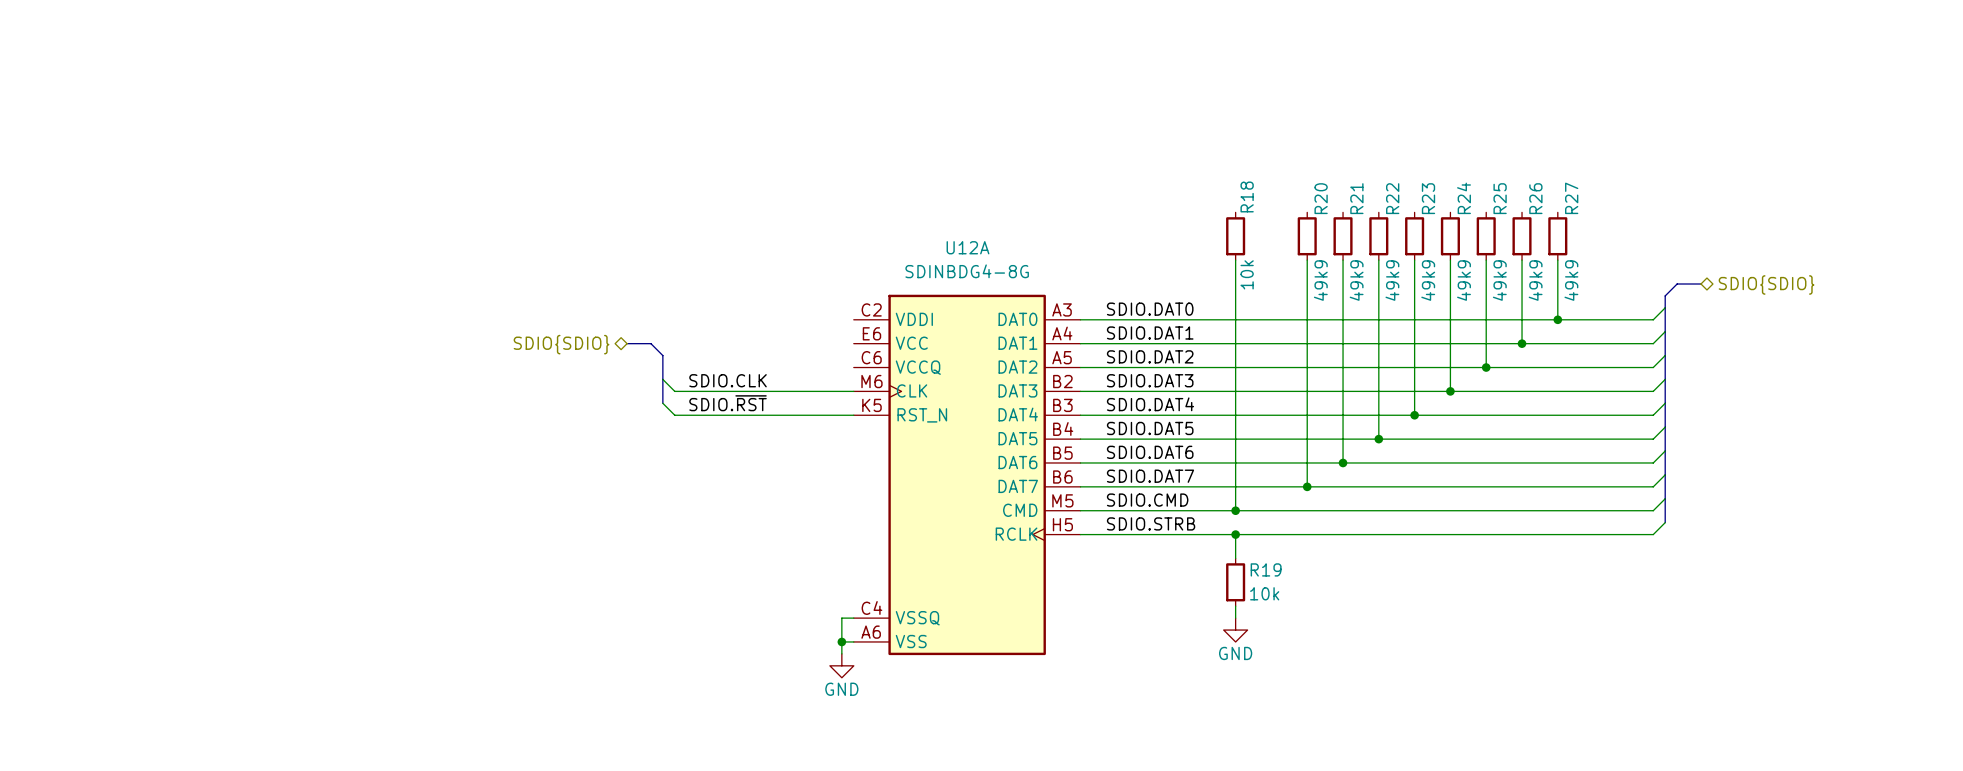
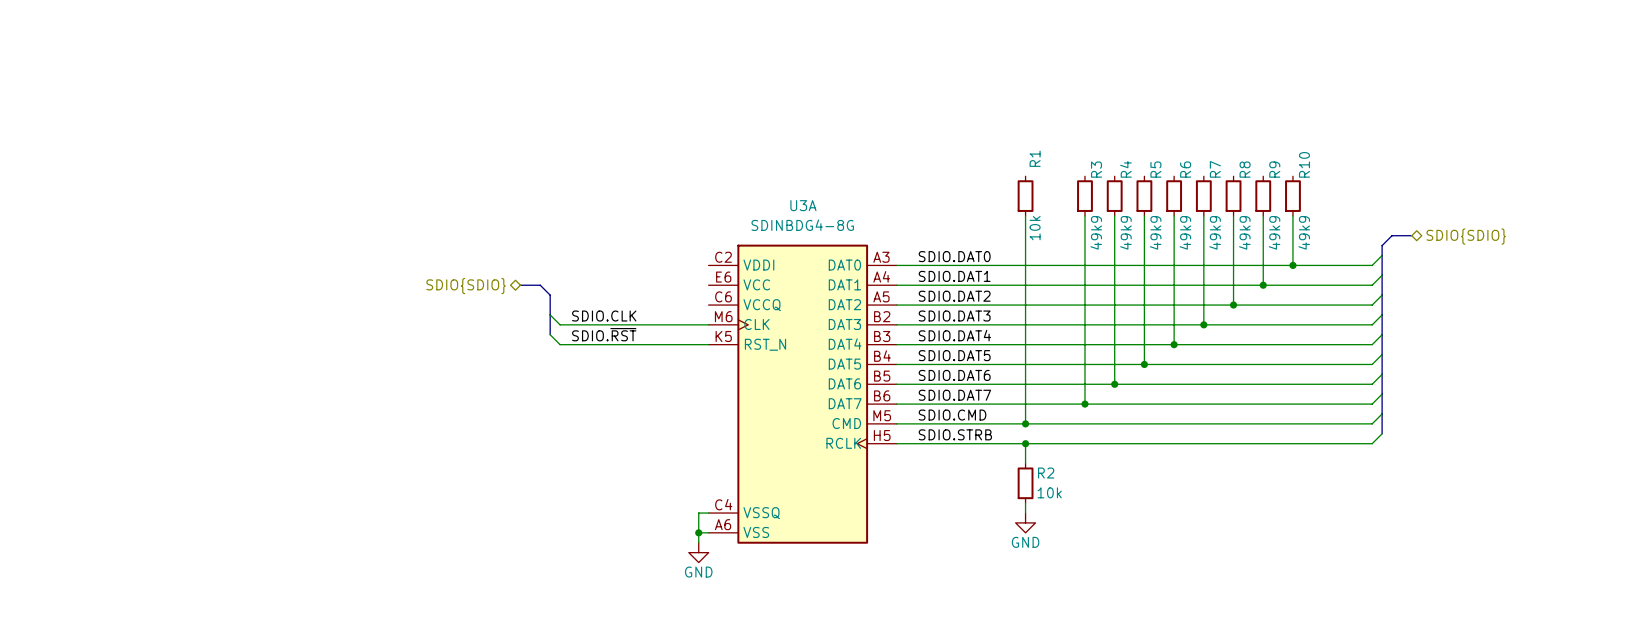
R18 name: R18 (1247, 196) -> R1 (1035, 158)
R20 name: R20 (1321, 198) -> R3 (1096, 169)
R21 name: R21 (1356, 198) -> R4 (1125, 169)
R22 name: R22 (1392, 198) -> R5 (1155, 169)
R23 name: R23 (1428, 198) -> R6 (1185, 169)
R24 name: R24 (1464, 198) -> R7 (1215, 169)
R25 name: R25 (1500, 198) -> R8 (1245, 169)
R26 name: R26 (1535, 198) -> R9 (1274, 169)
R27 name: R27 (1571, 198) -> R10 (1304, 164)
U12A name: U12A (968, 247) -> U3A (803, 205)
R19 name: R19 (1266, 569) -> R2 (1046, 473)

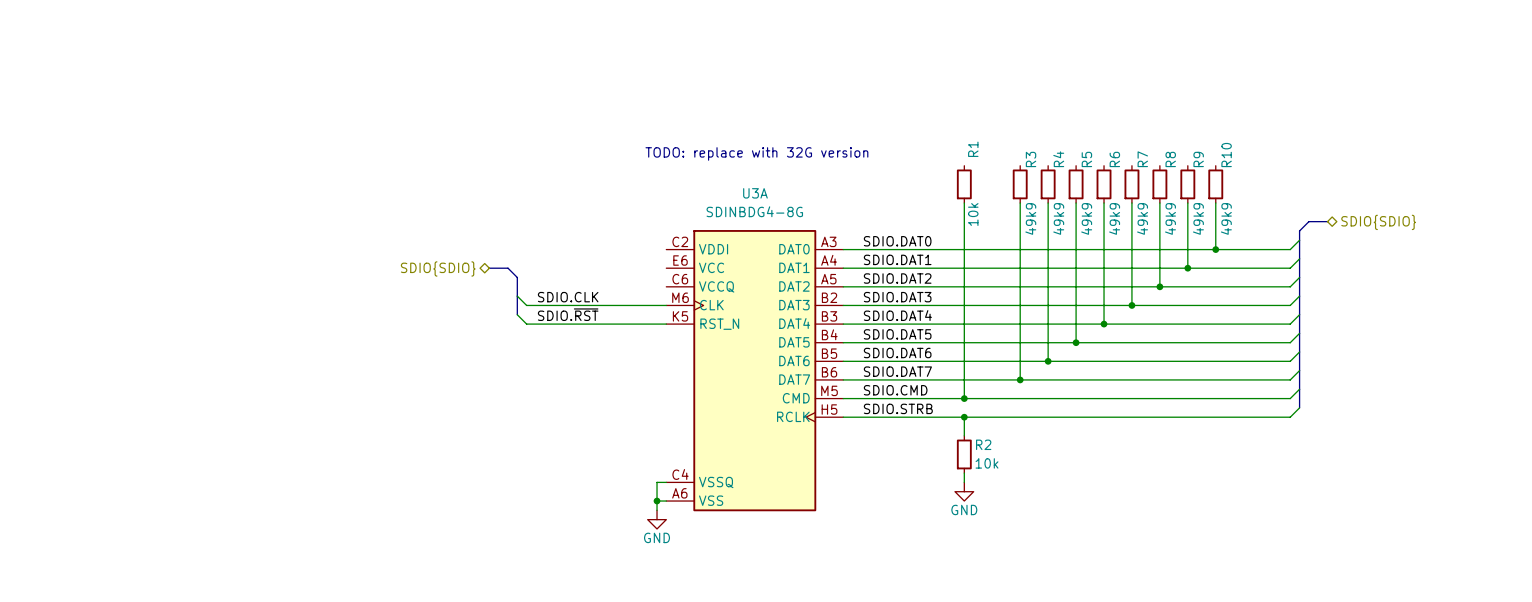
text: none -> TODO: replace with 32G version (756, 153)

